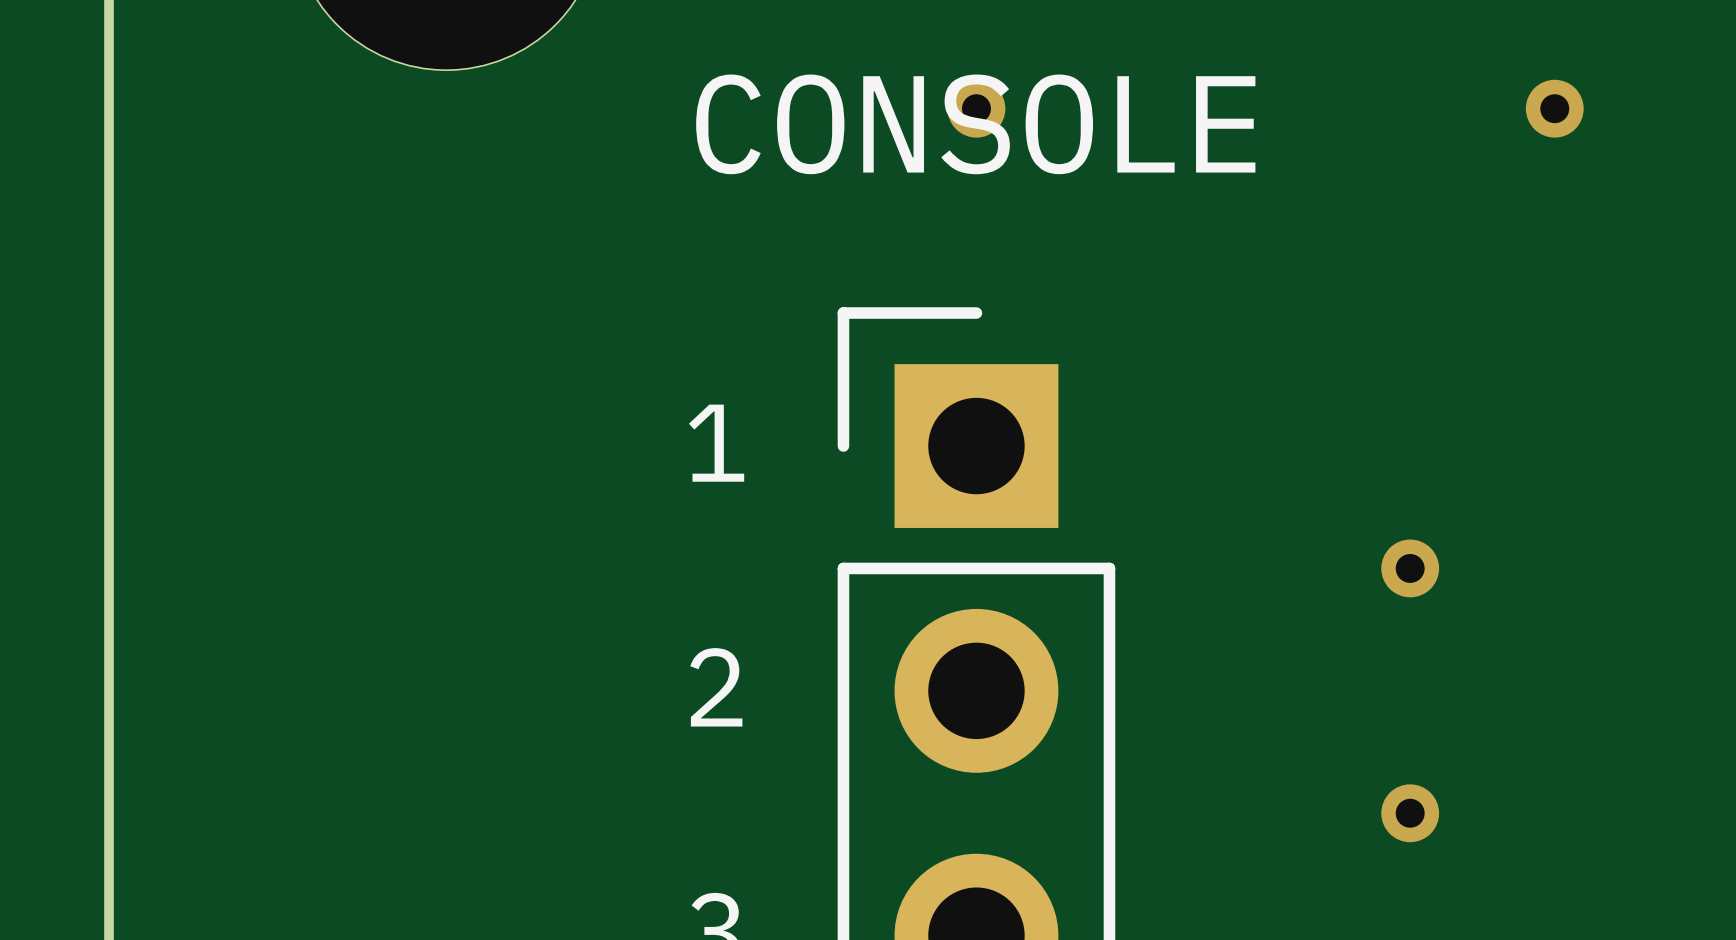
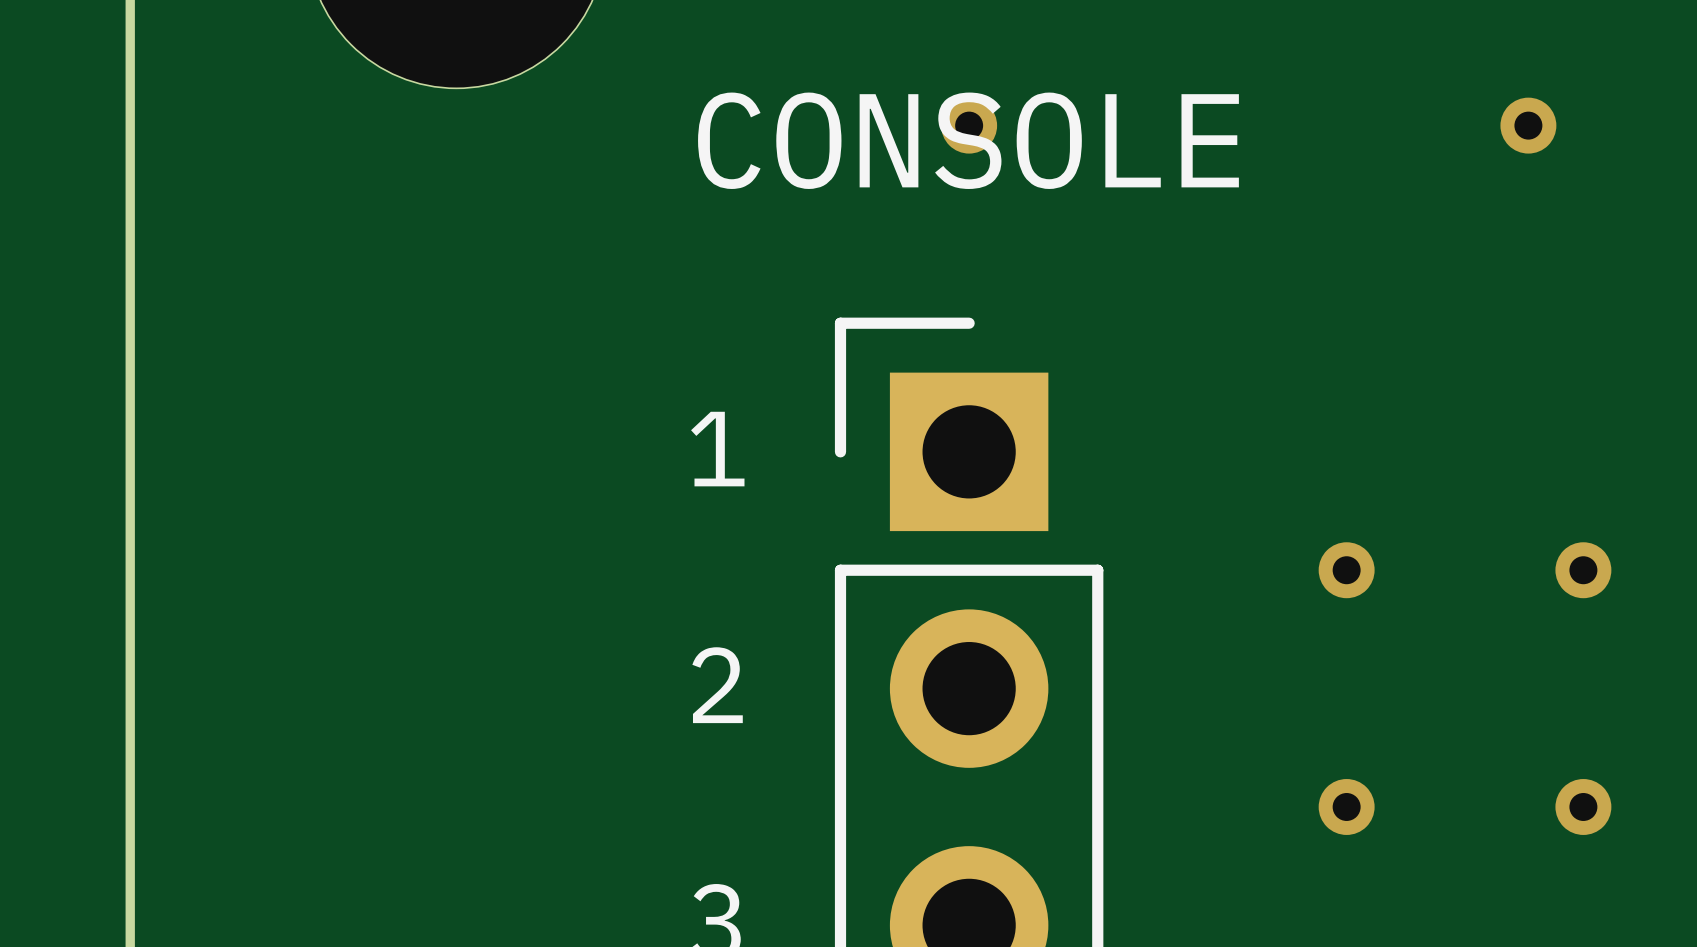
via position: (1410, 568) -> (1346, 570)
via: none -> (1583, 570)
via position: (1410, 813) -> (1346, 806)
via: none -> (1583, 806)

